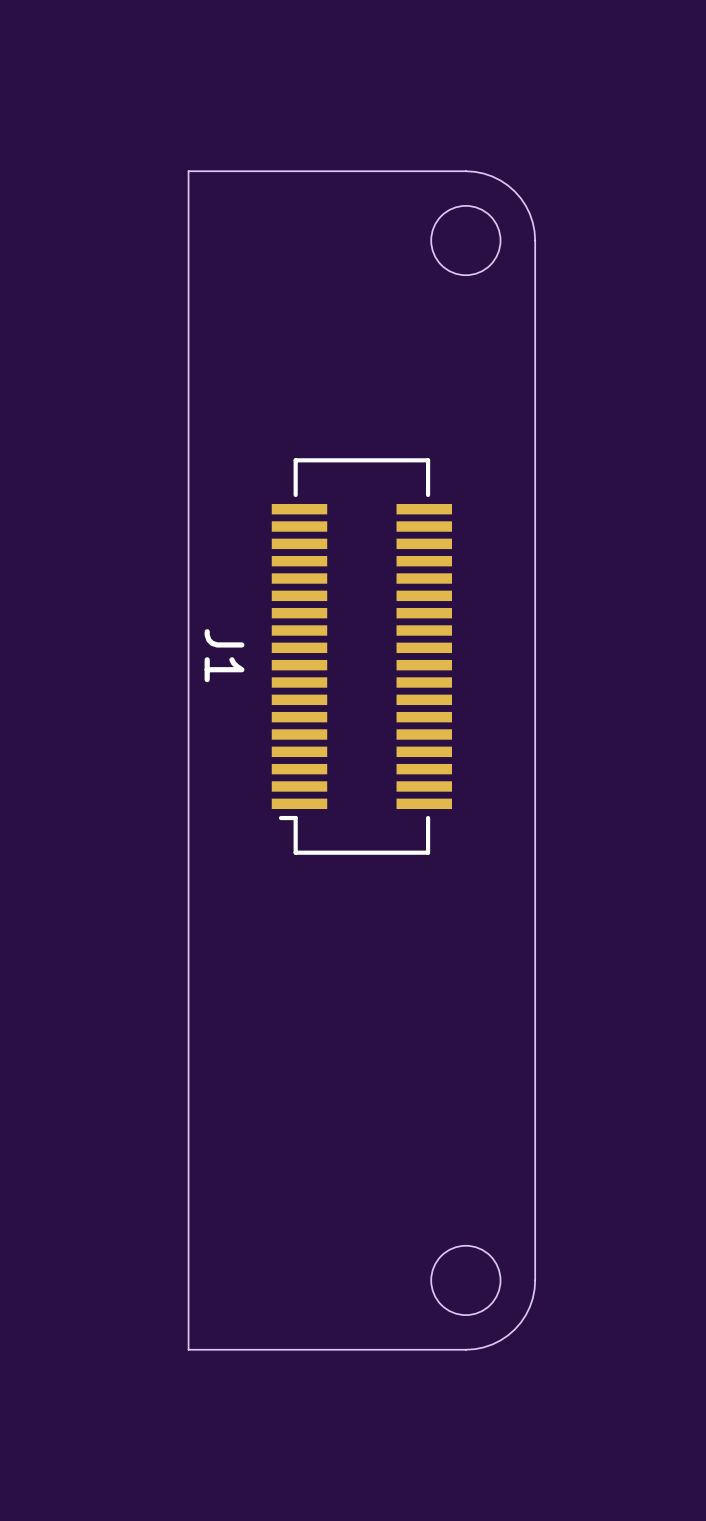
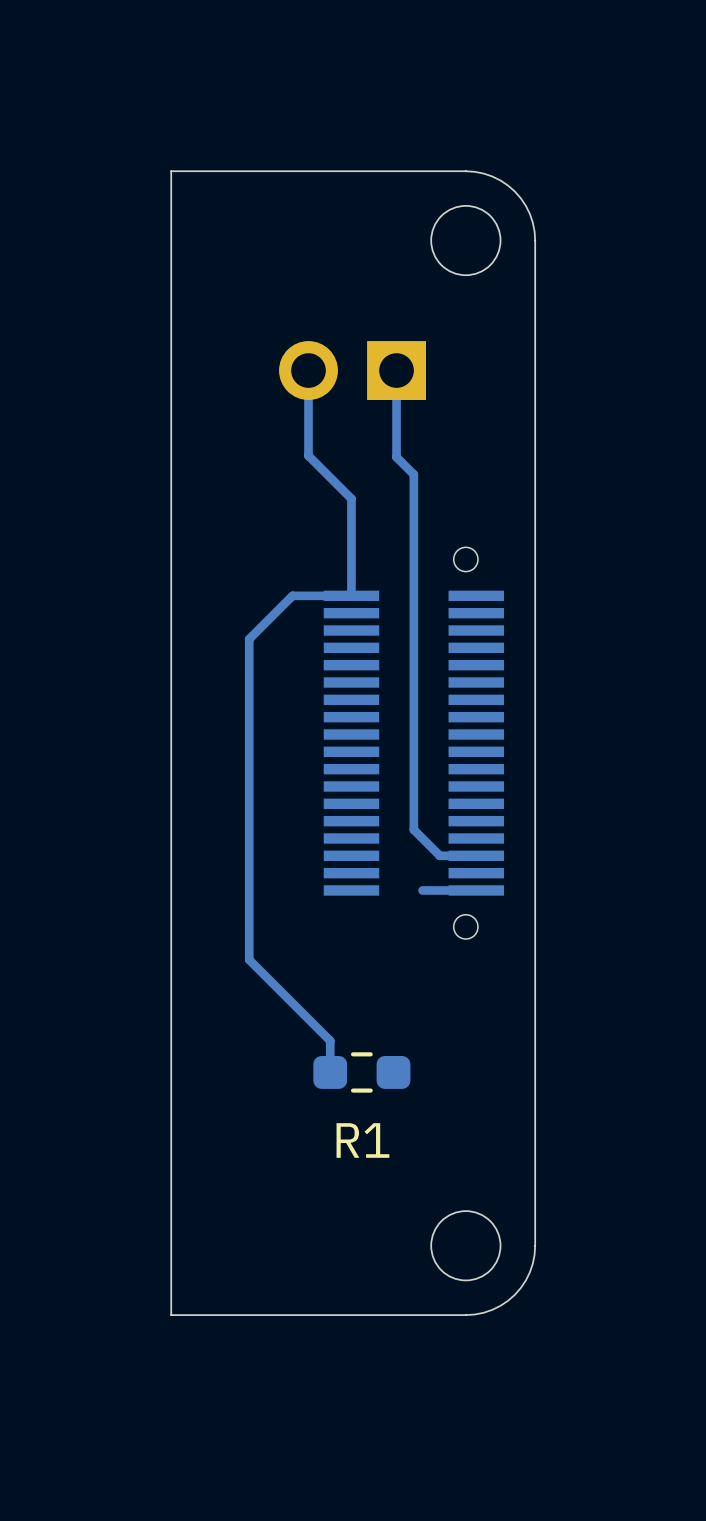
board edge: (188, 171) (188, 1349) (465, 1349) (483, 1347) (508, 1335) (525, 1315) (534, 1289) (535, 1245) -> (188, 171) (171, 171) (171, 1315) (474, 1314) (492, 1309) (514, 1294) (529, 1272) (535, 1245)
track: none -> (308, 370) (308, 455) (351, 498) (351, 595) (292, 595) (249, 639) (249, 959) (330, 1040) (330, 1072)
part: none -> (352, 370)
track: none -> (396, 370) (396, 457) (413, 474) (413, 829) (439, 855) (476, 855)
J1: (361, 656) -> none
part: none -> (413, 743)
track: none -> (476, 890) (422, 890)
R1: none -> (361, 1072)
round board edge position: (465, 1280) -> (465, 1245)

